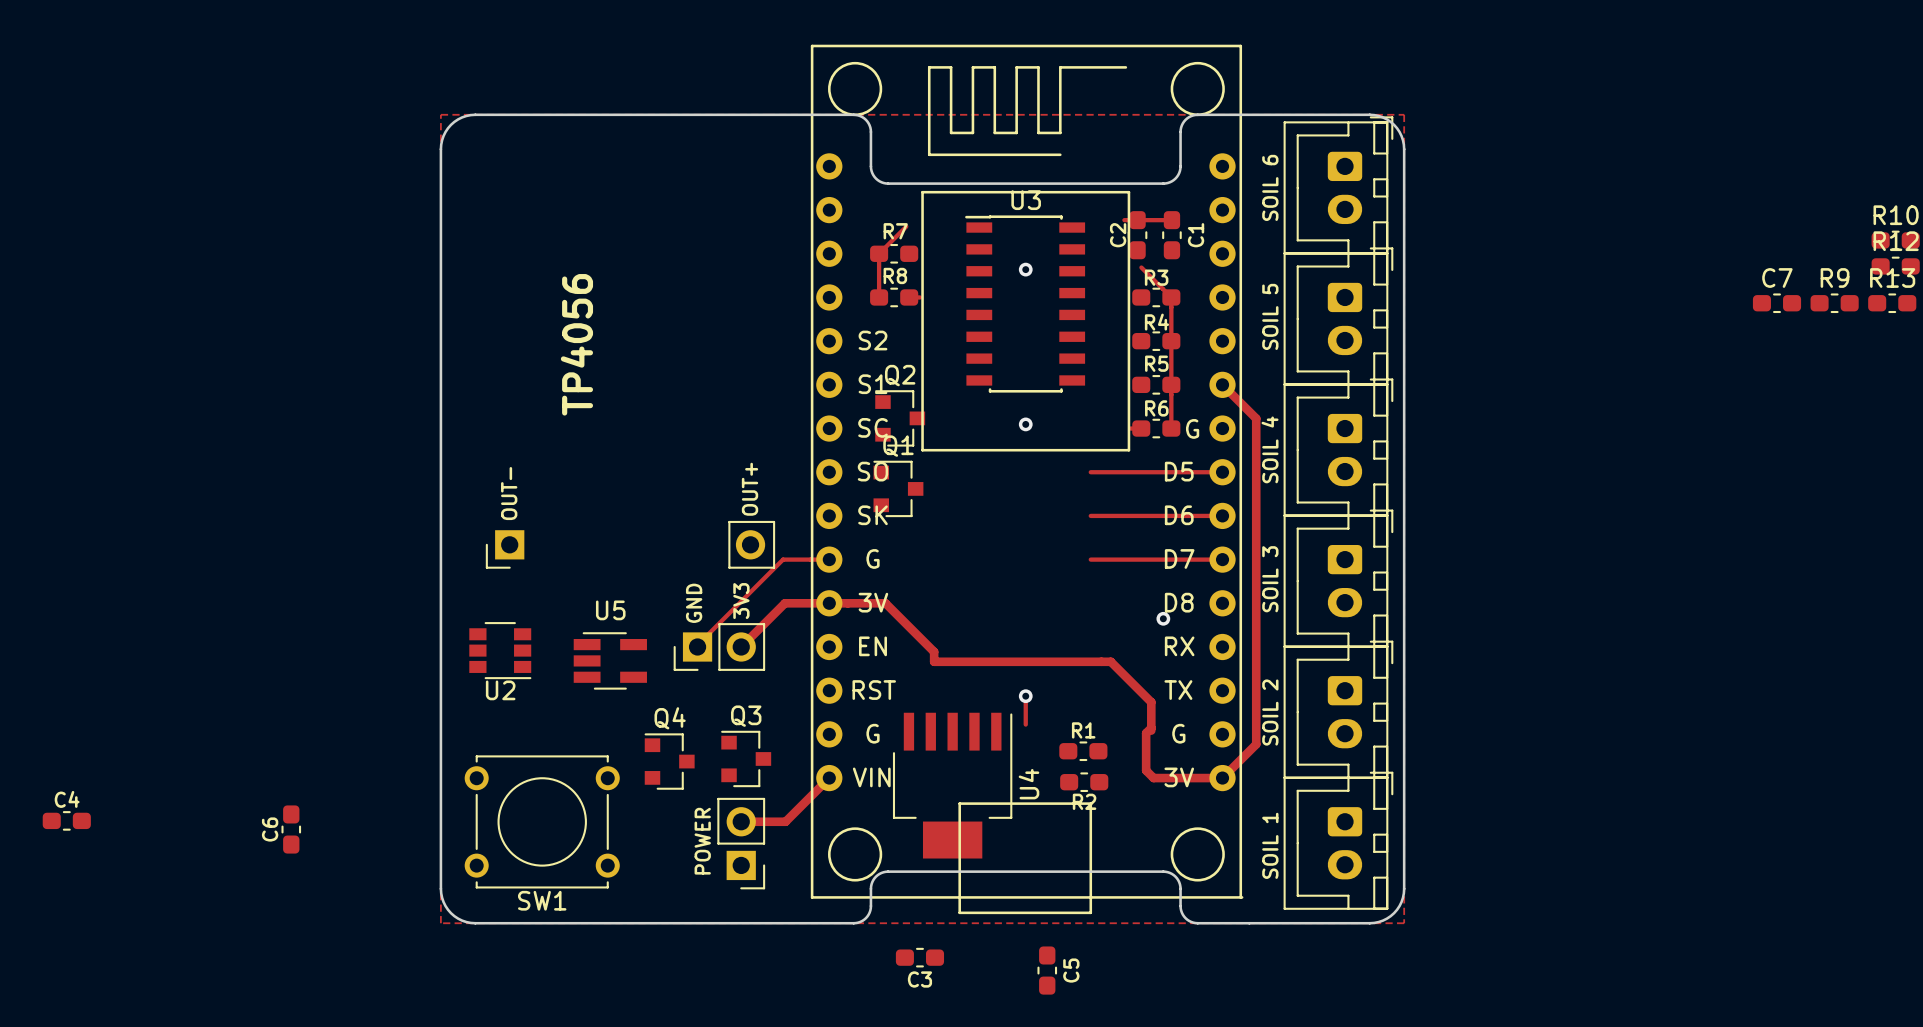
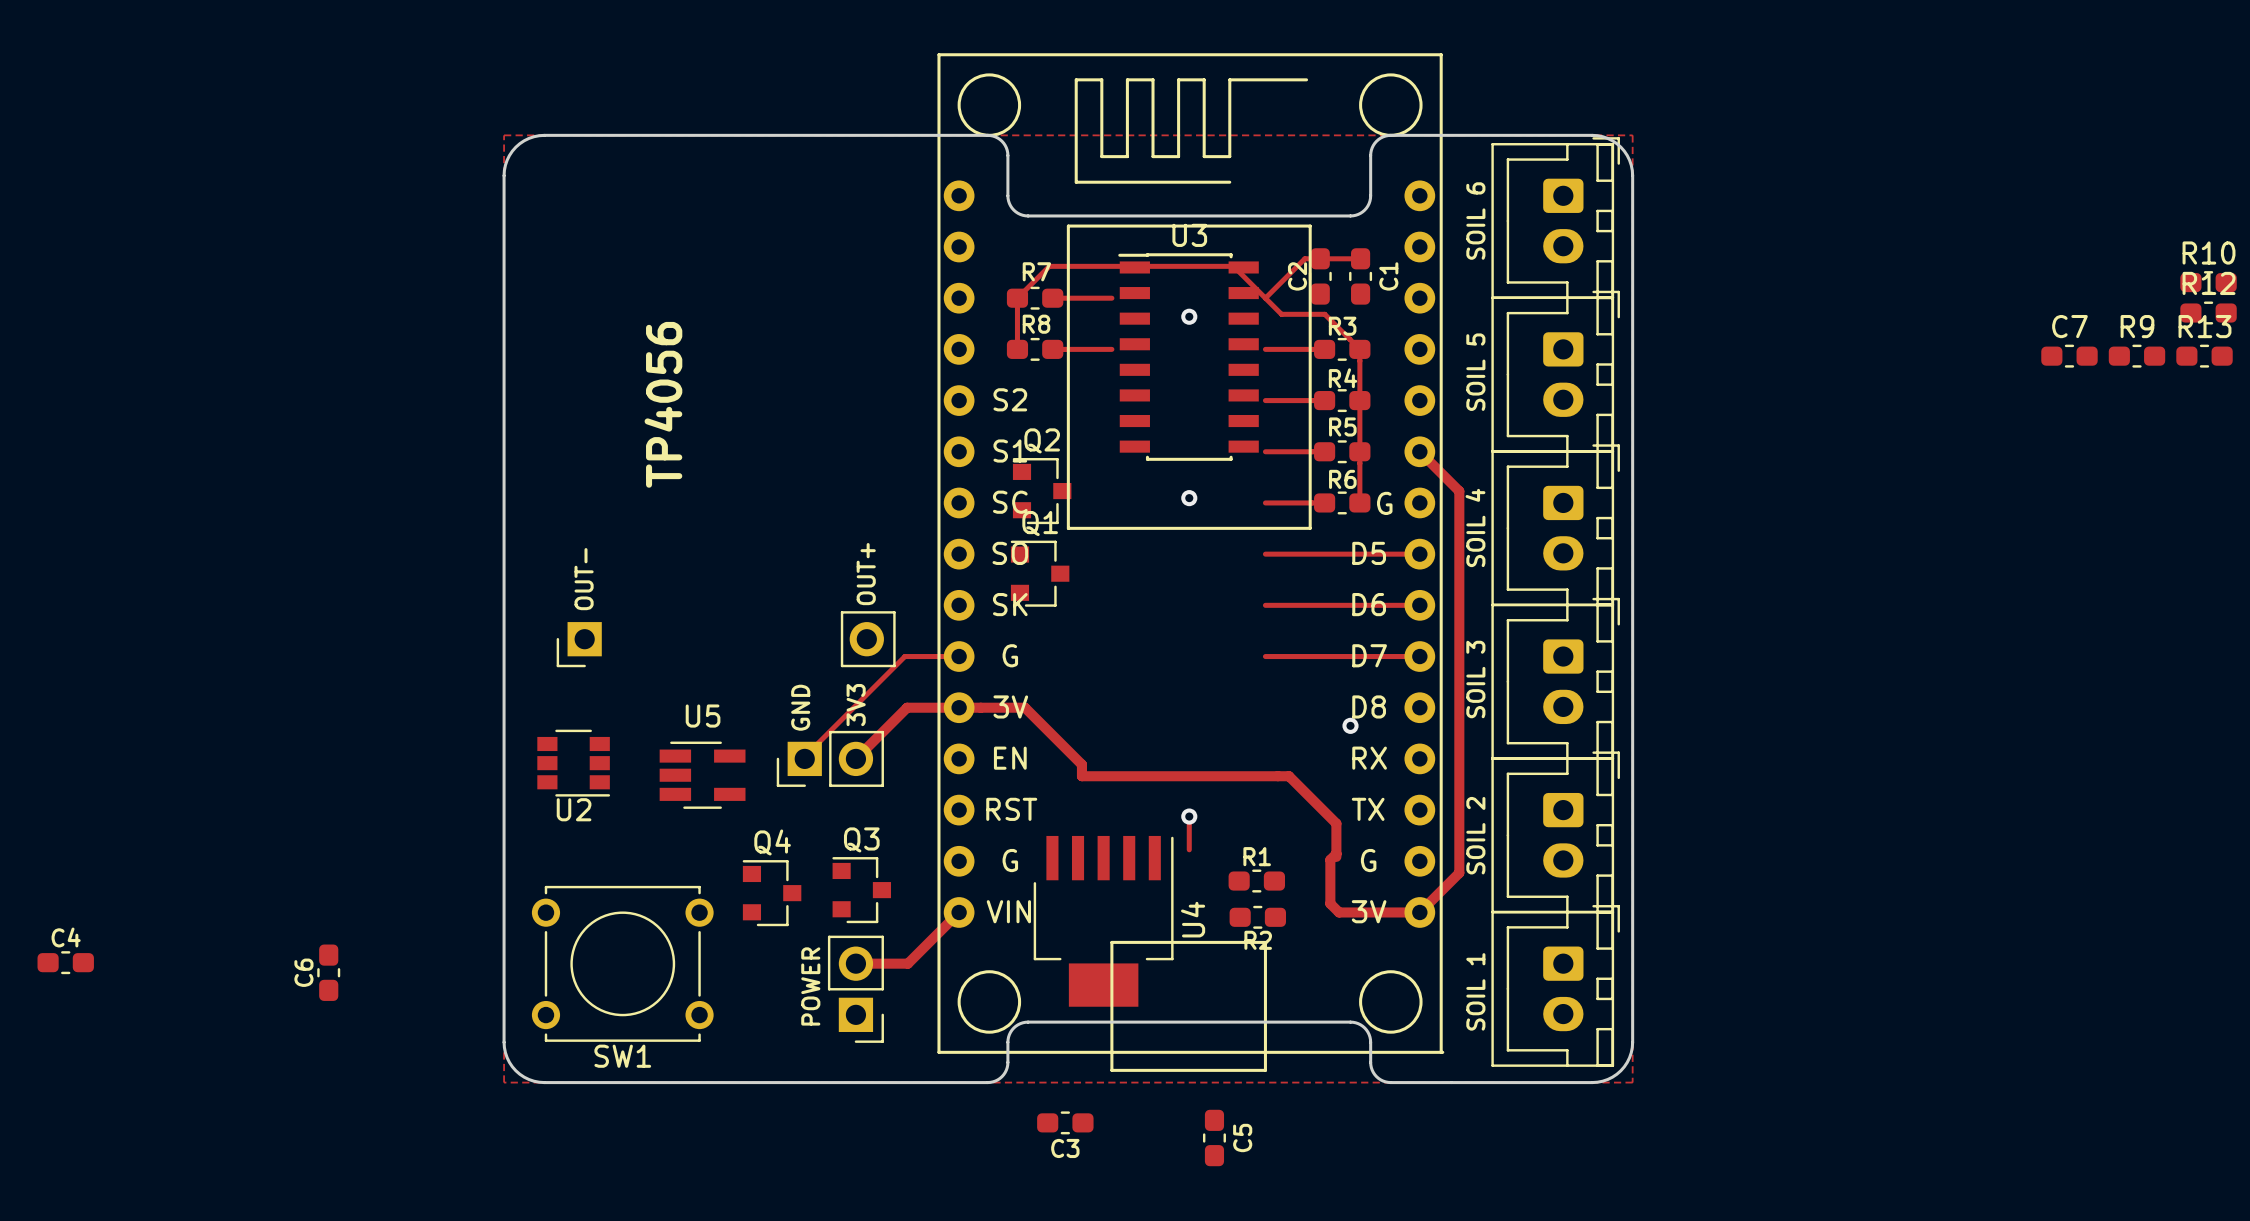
track: none -> (1304, 258) (1265, 298)
track: none -> (1049, 266) (1233, 266) (1281, 314) (1324, 314)
track: none -> (1052, 298) (1111, 298)
track: none -> (1065, 349) (1111, 349)
track: none -> (1265, 349) (1324, 349)
track: none -> (1265, 400) (1324, 400)
track: none -> (1265, 451) (1324, 451)
track: none -> (1265, 502) (1312, 502)

